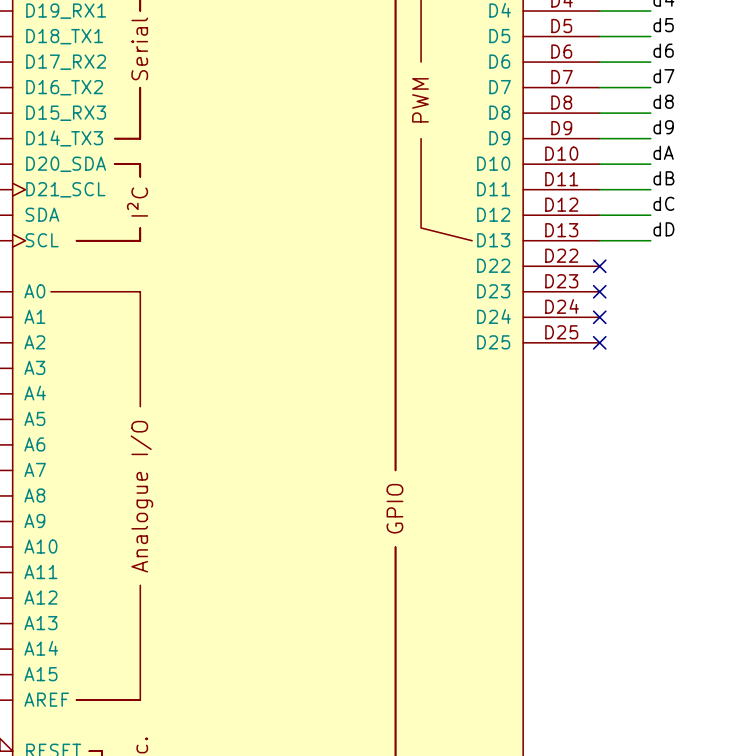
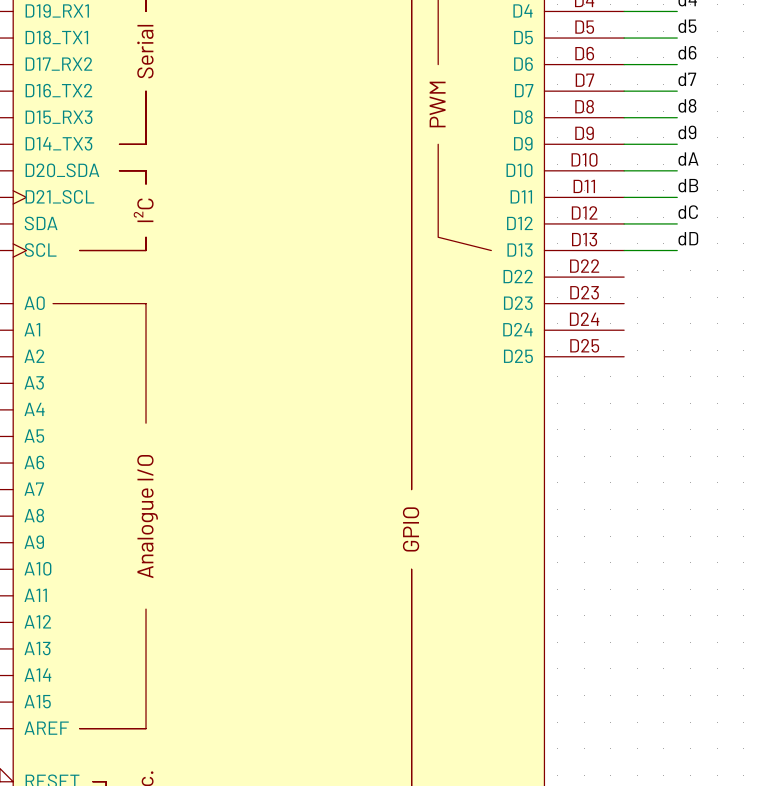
no-connect mark: (599, 266) -> none
no-connect mark: (599, 291) -> none
no-connect mark: (599, 317) -> none
no-connect mark: (599, 342) -> none

